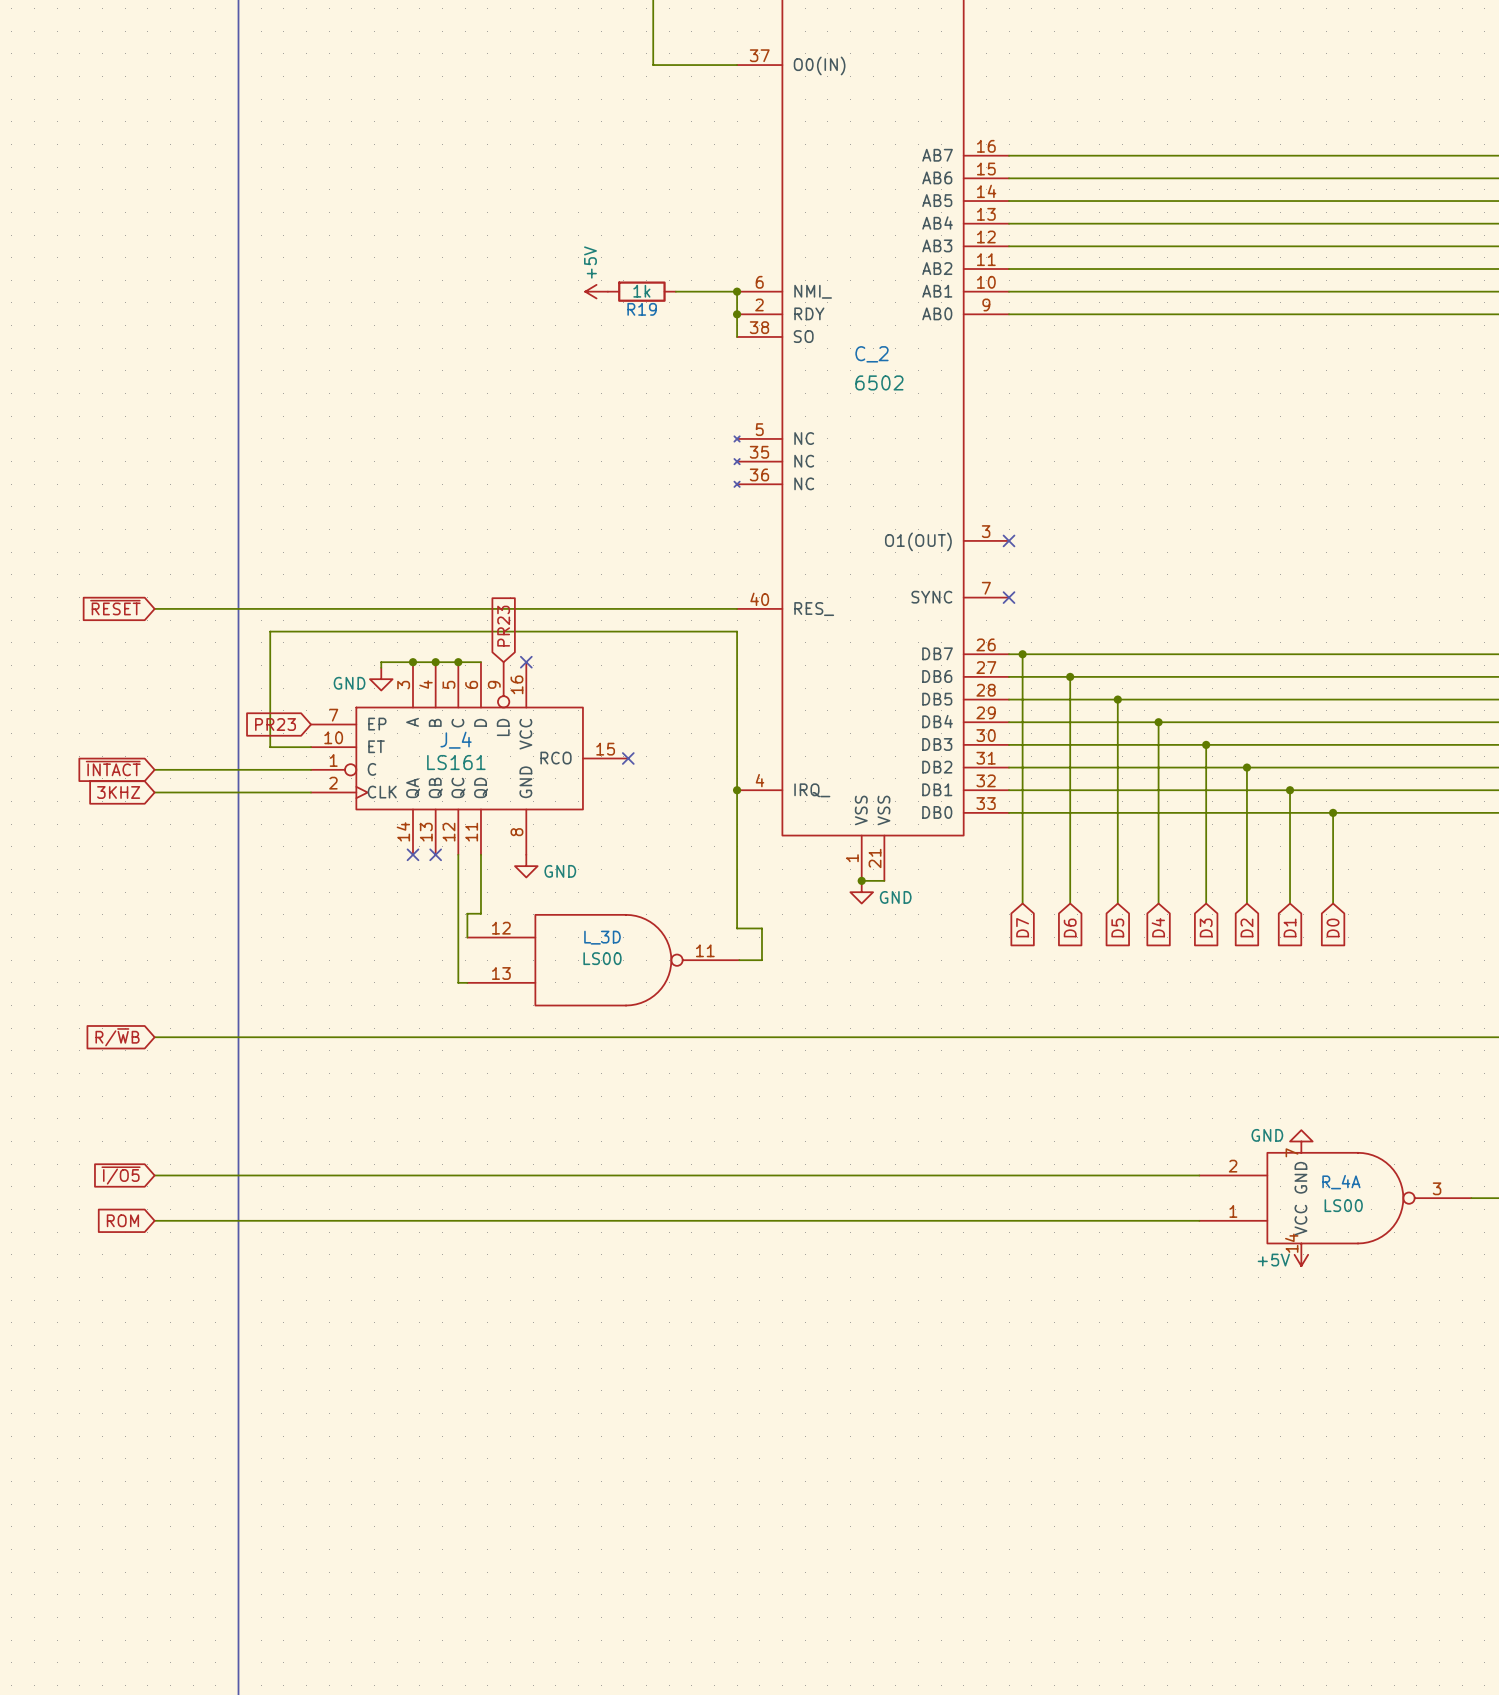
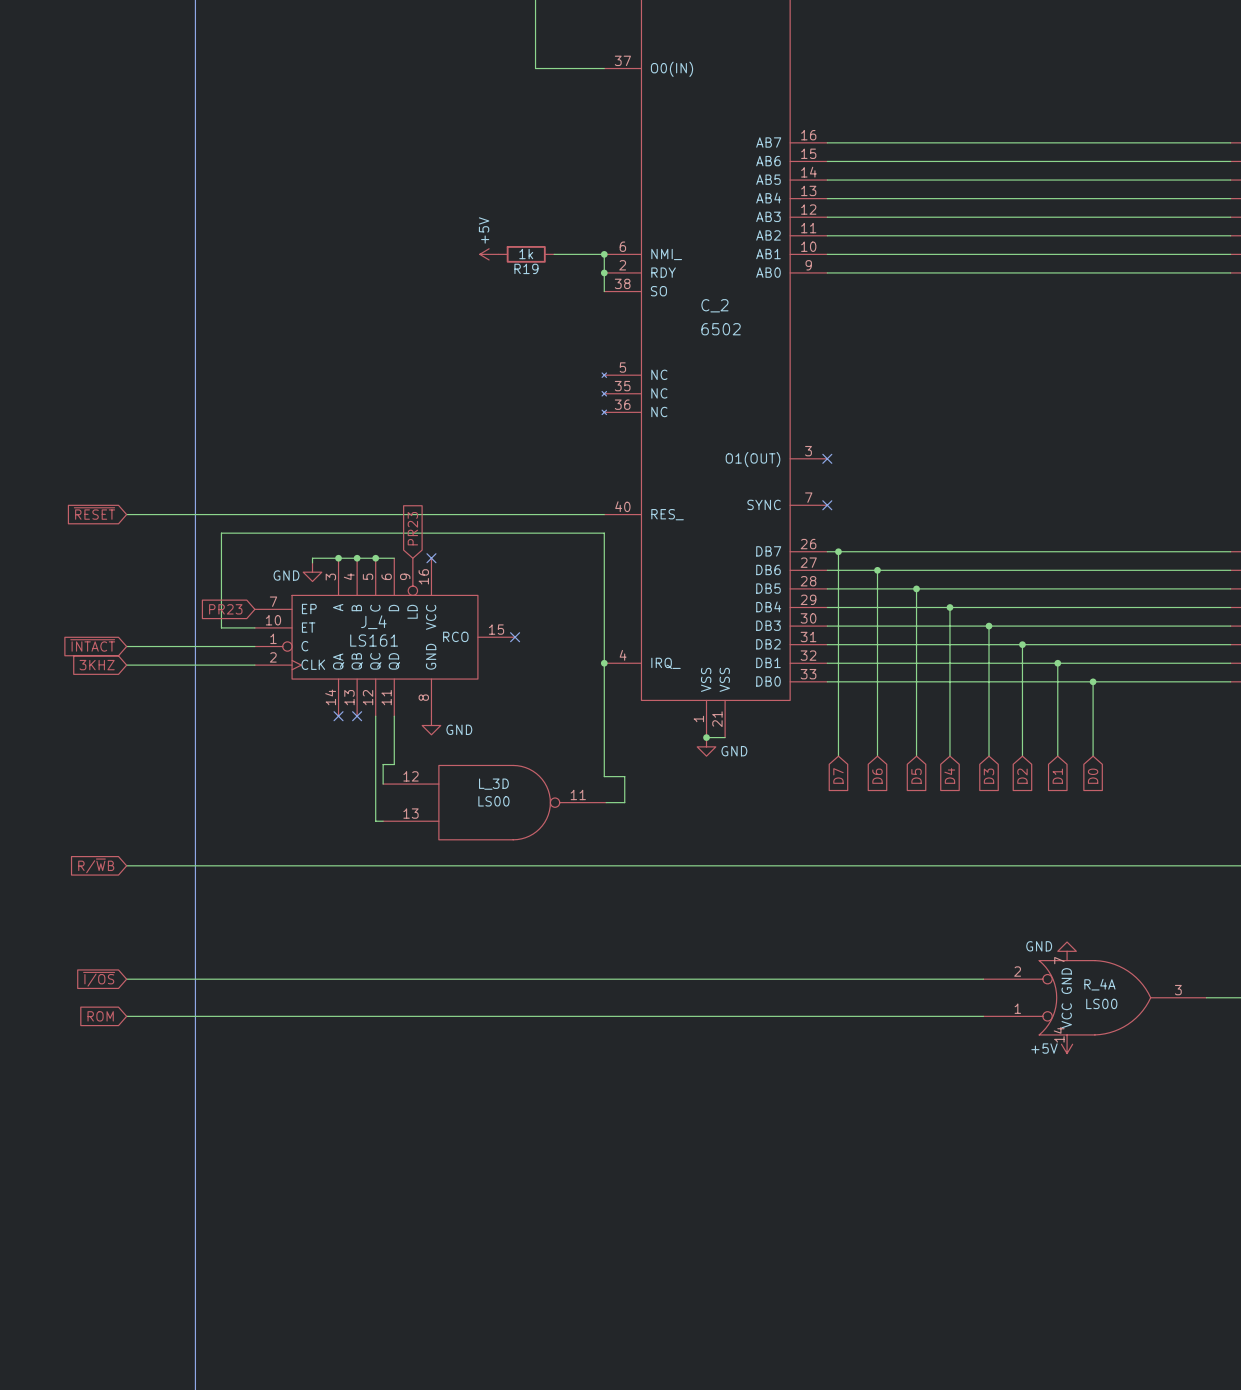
R_4A symbol: [1199, 1152, 1472, 1244] -> [983, 960, 1207, 1035]
global label: ~{I/O5} (121, 1175) -> ~{I/OS} (99, 979)

